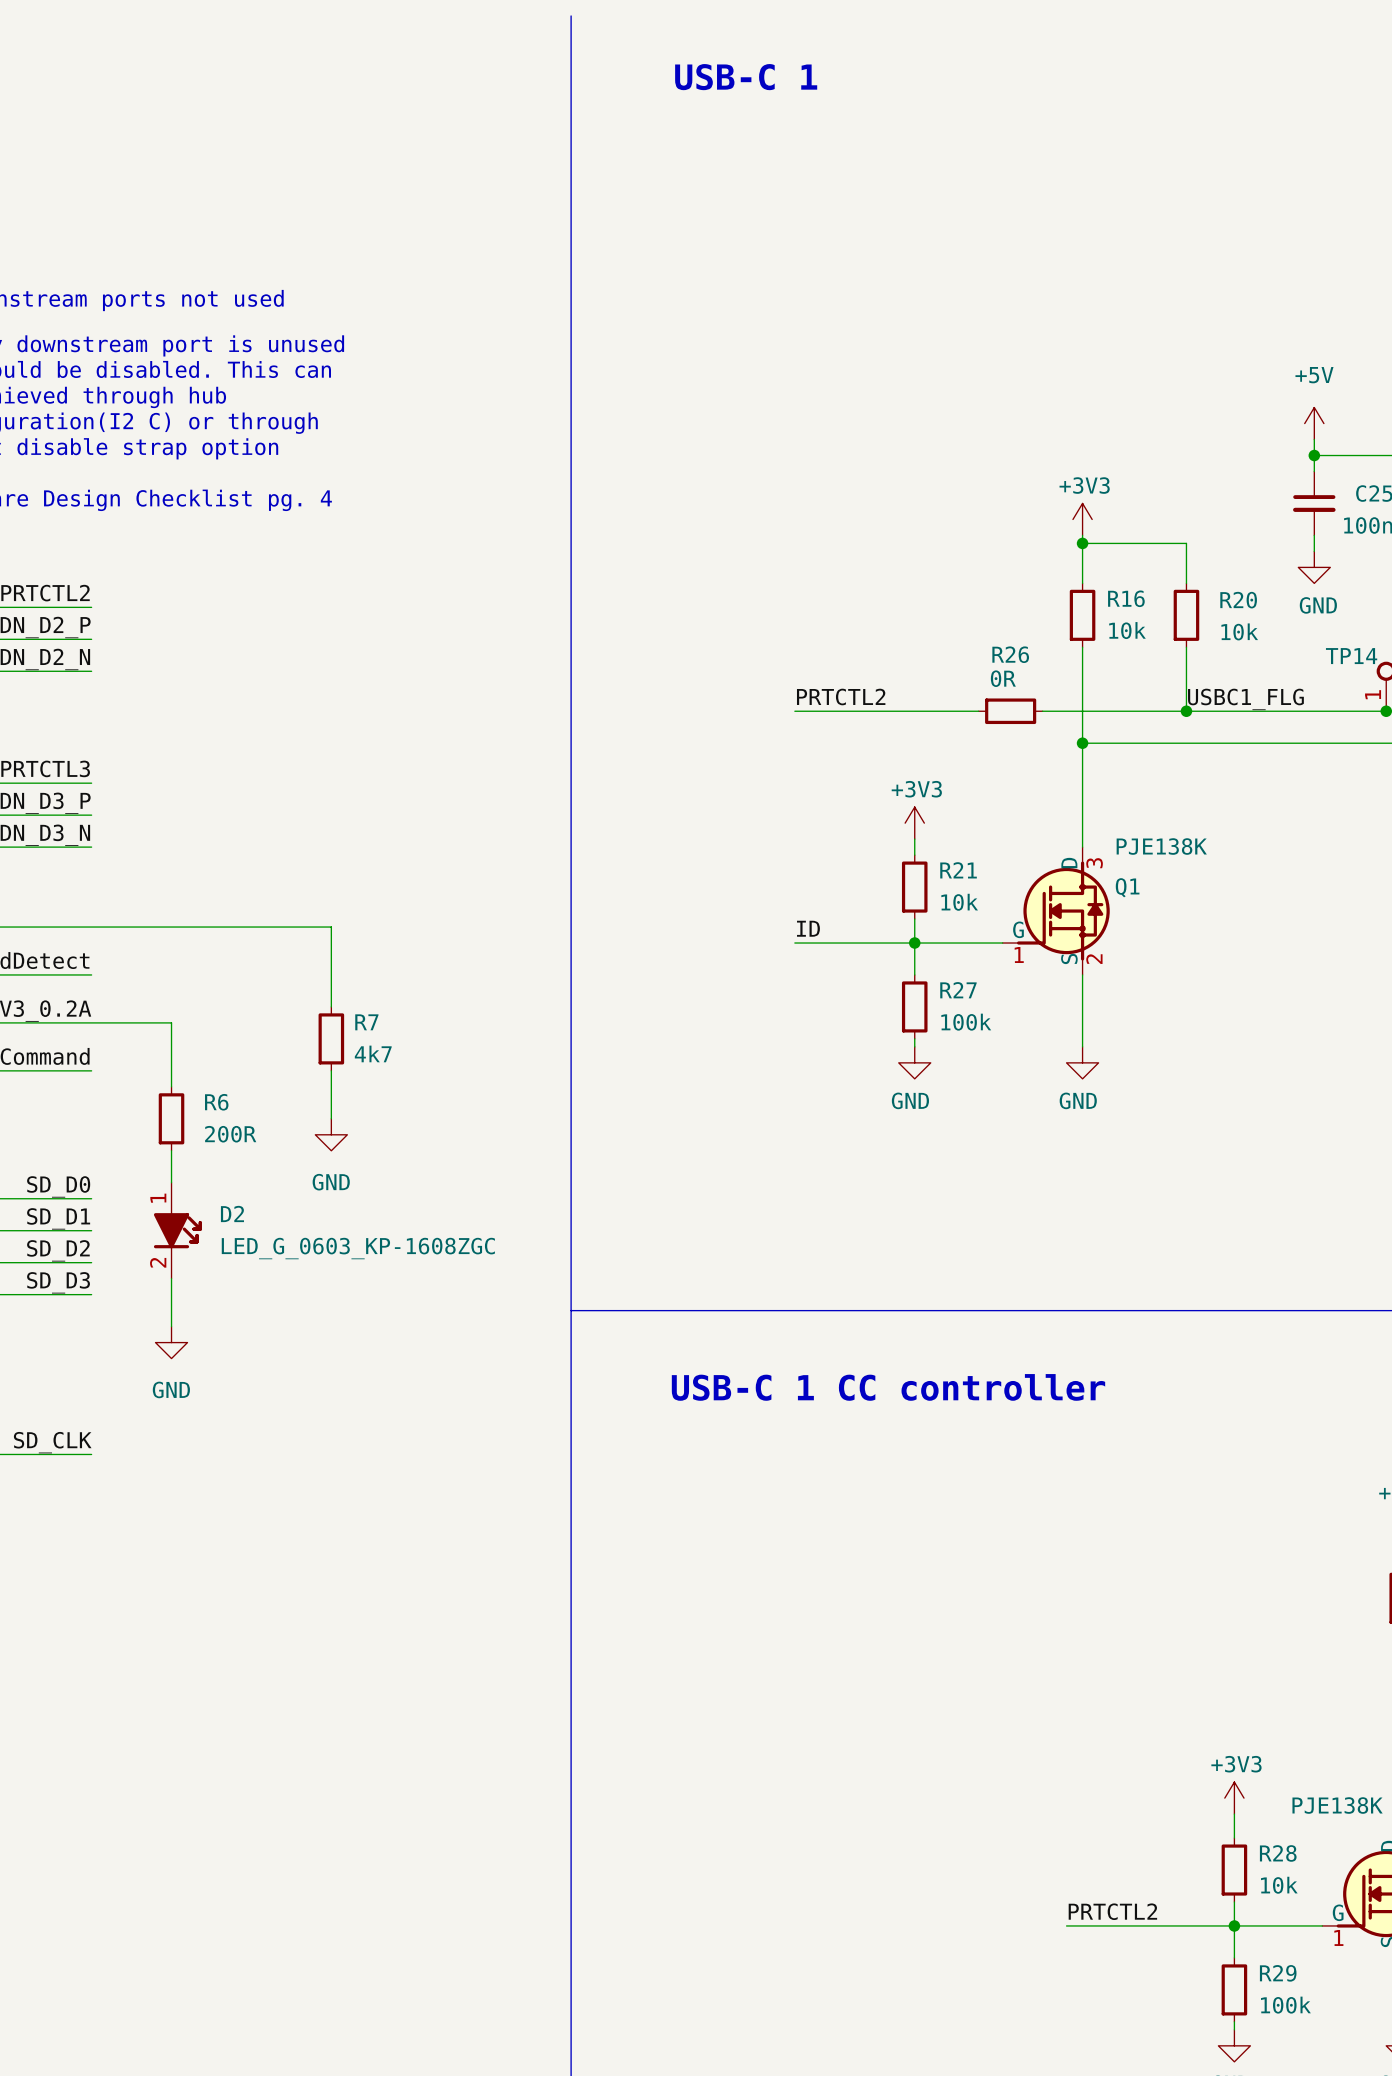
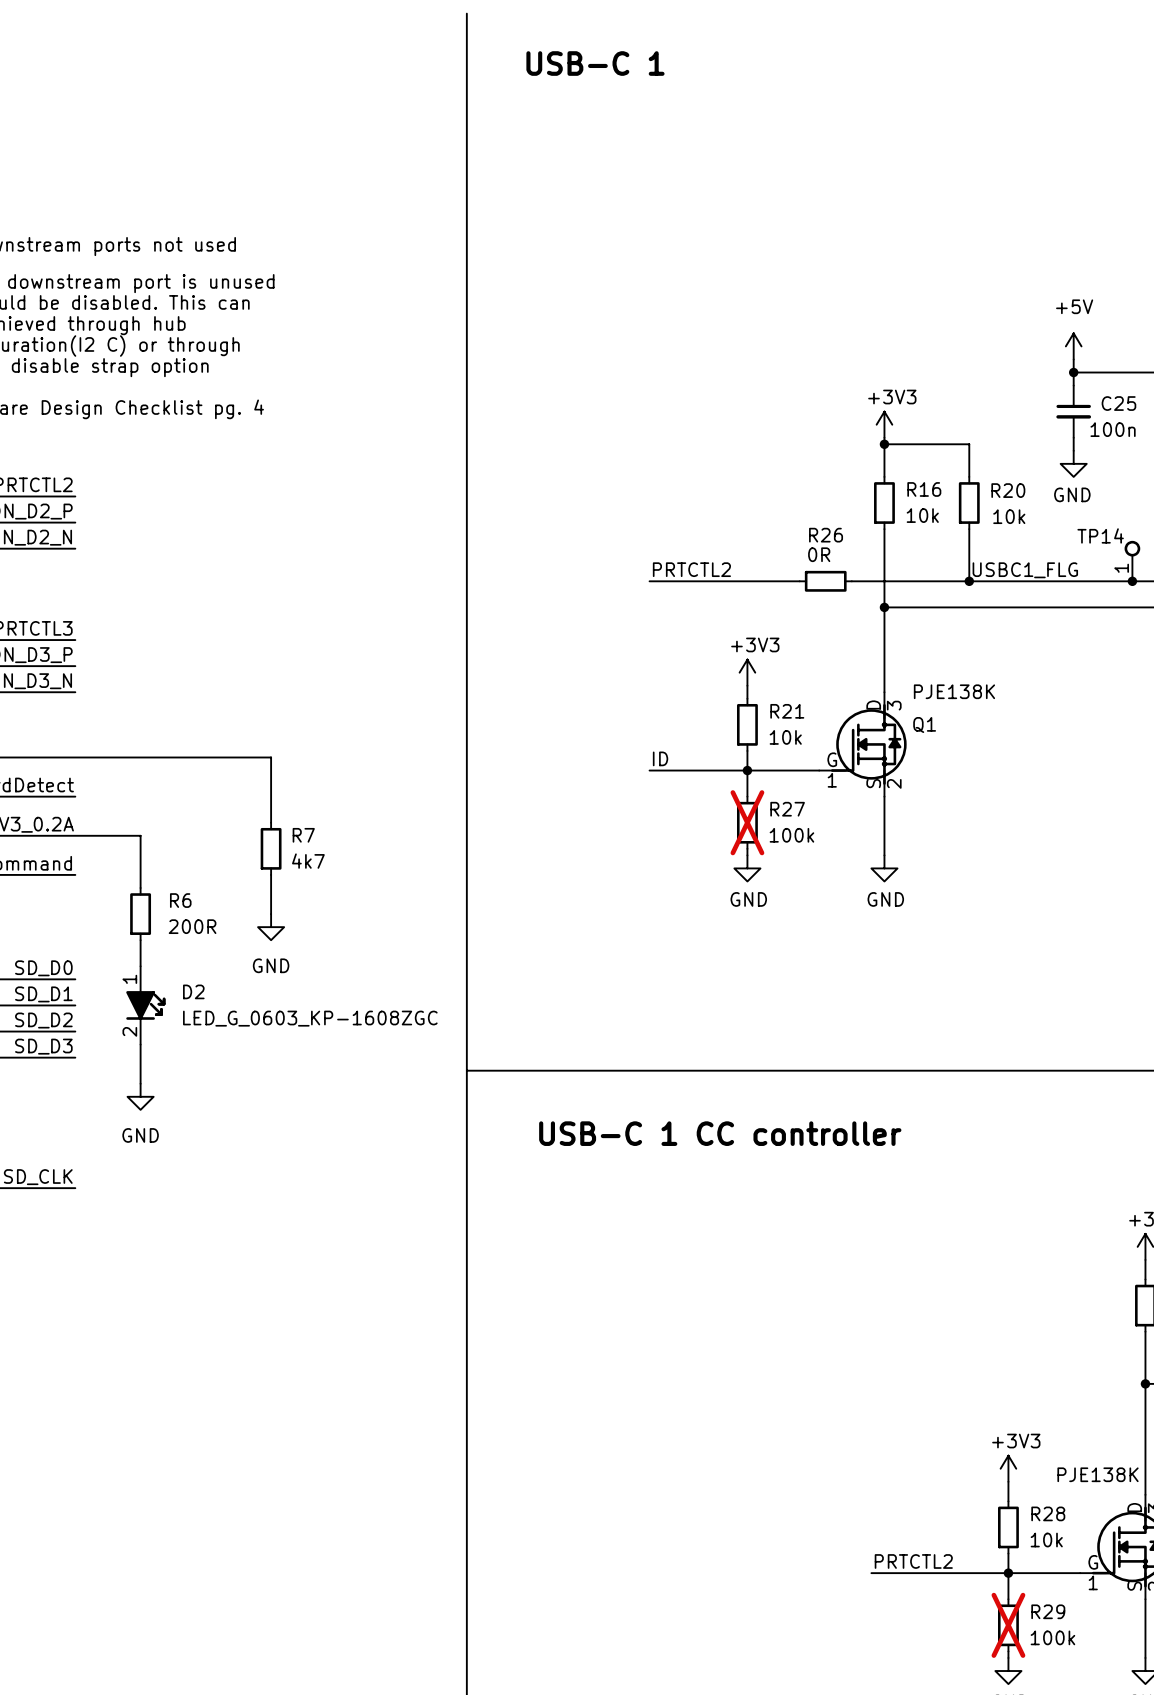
R27 do-not-place cross: none -> (747, 822)
R29 do-not-place cross: none -> (1008, 1625)

